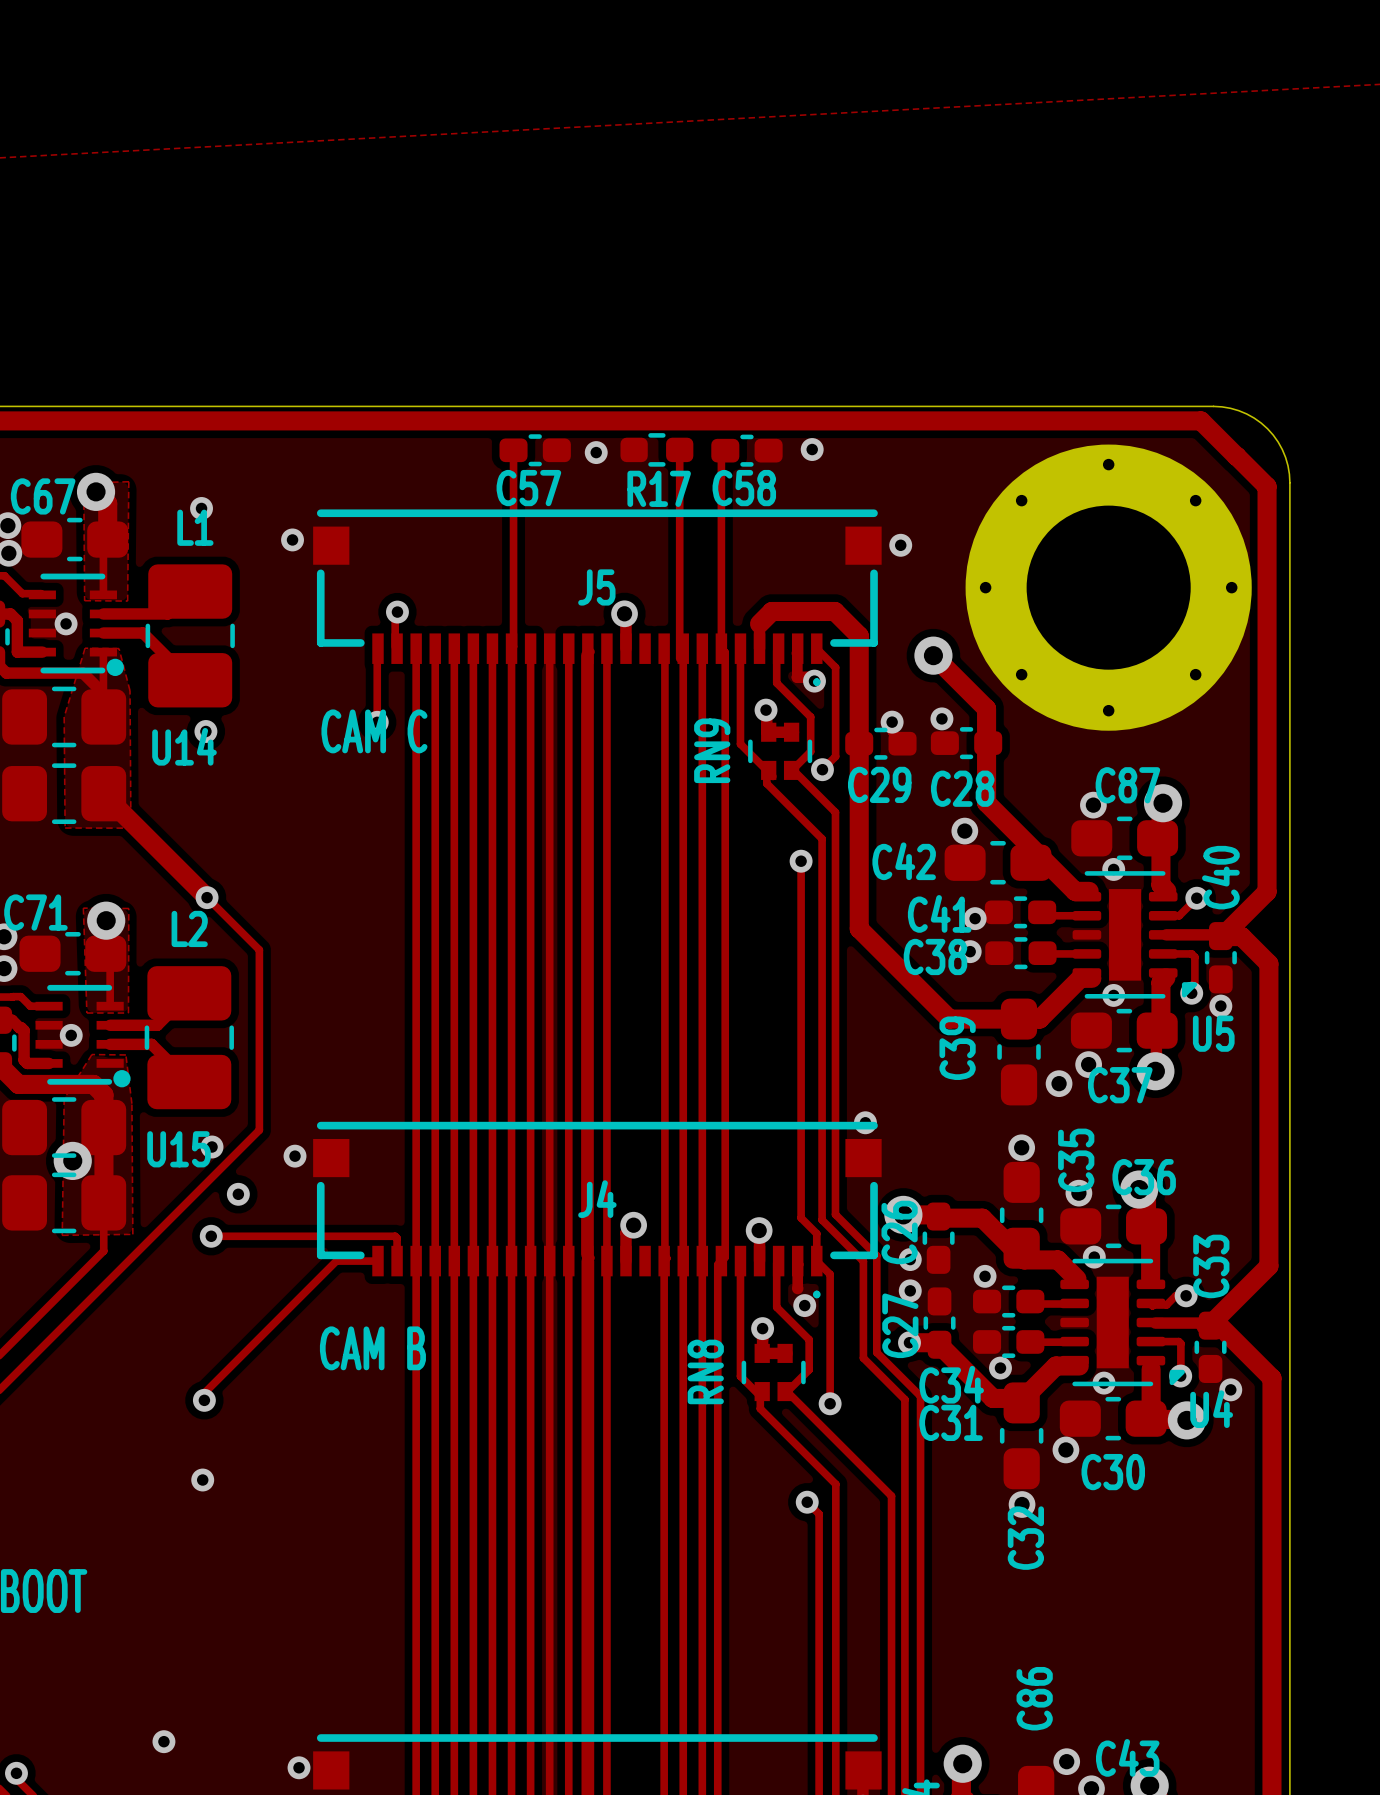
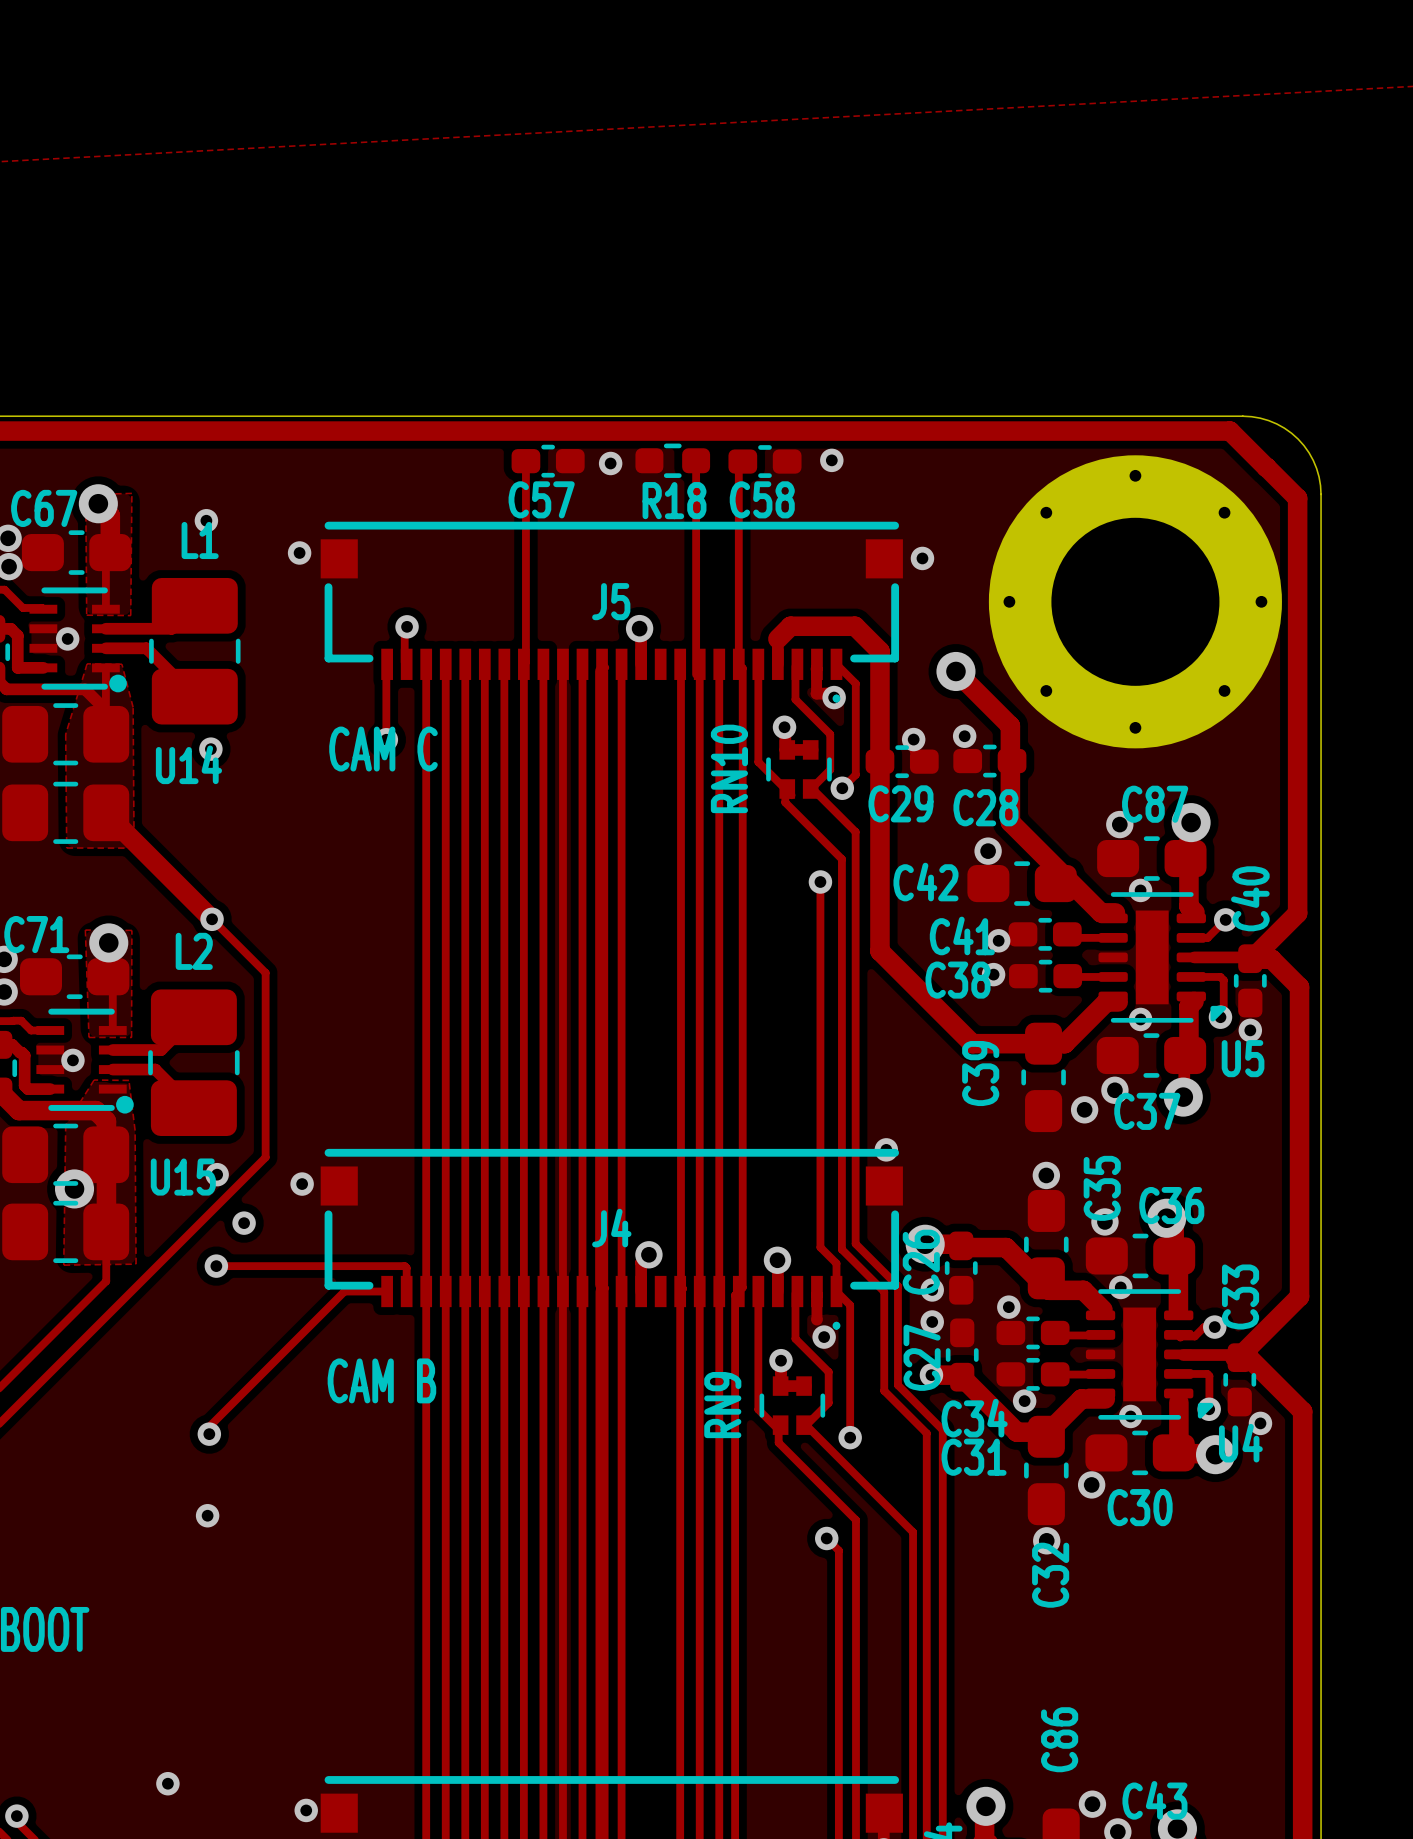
R17 name: R17 (659, 488) -> R18 (674, 500)
RN9 name: RN9 (712, 750) -> RN10 (729, 768)
RN8 name: RN8 (705, 1371) -> RN9 (722, 1405)

